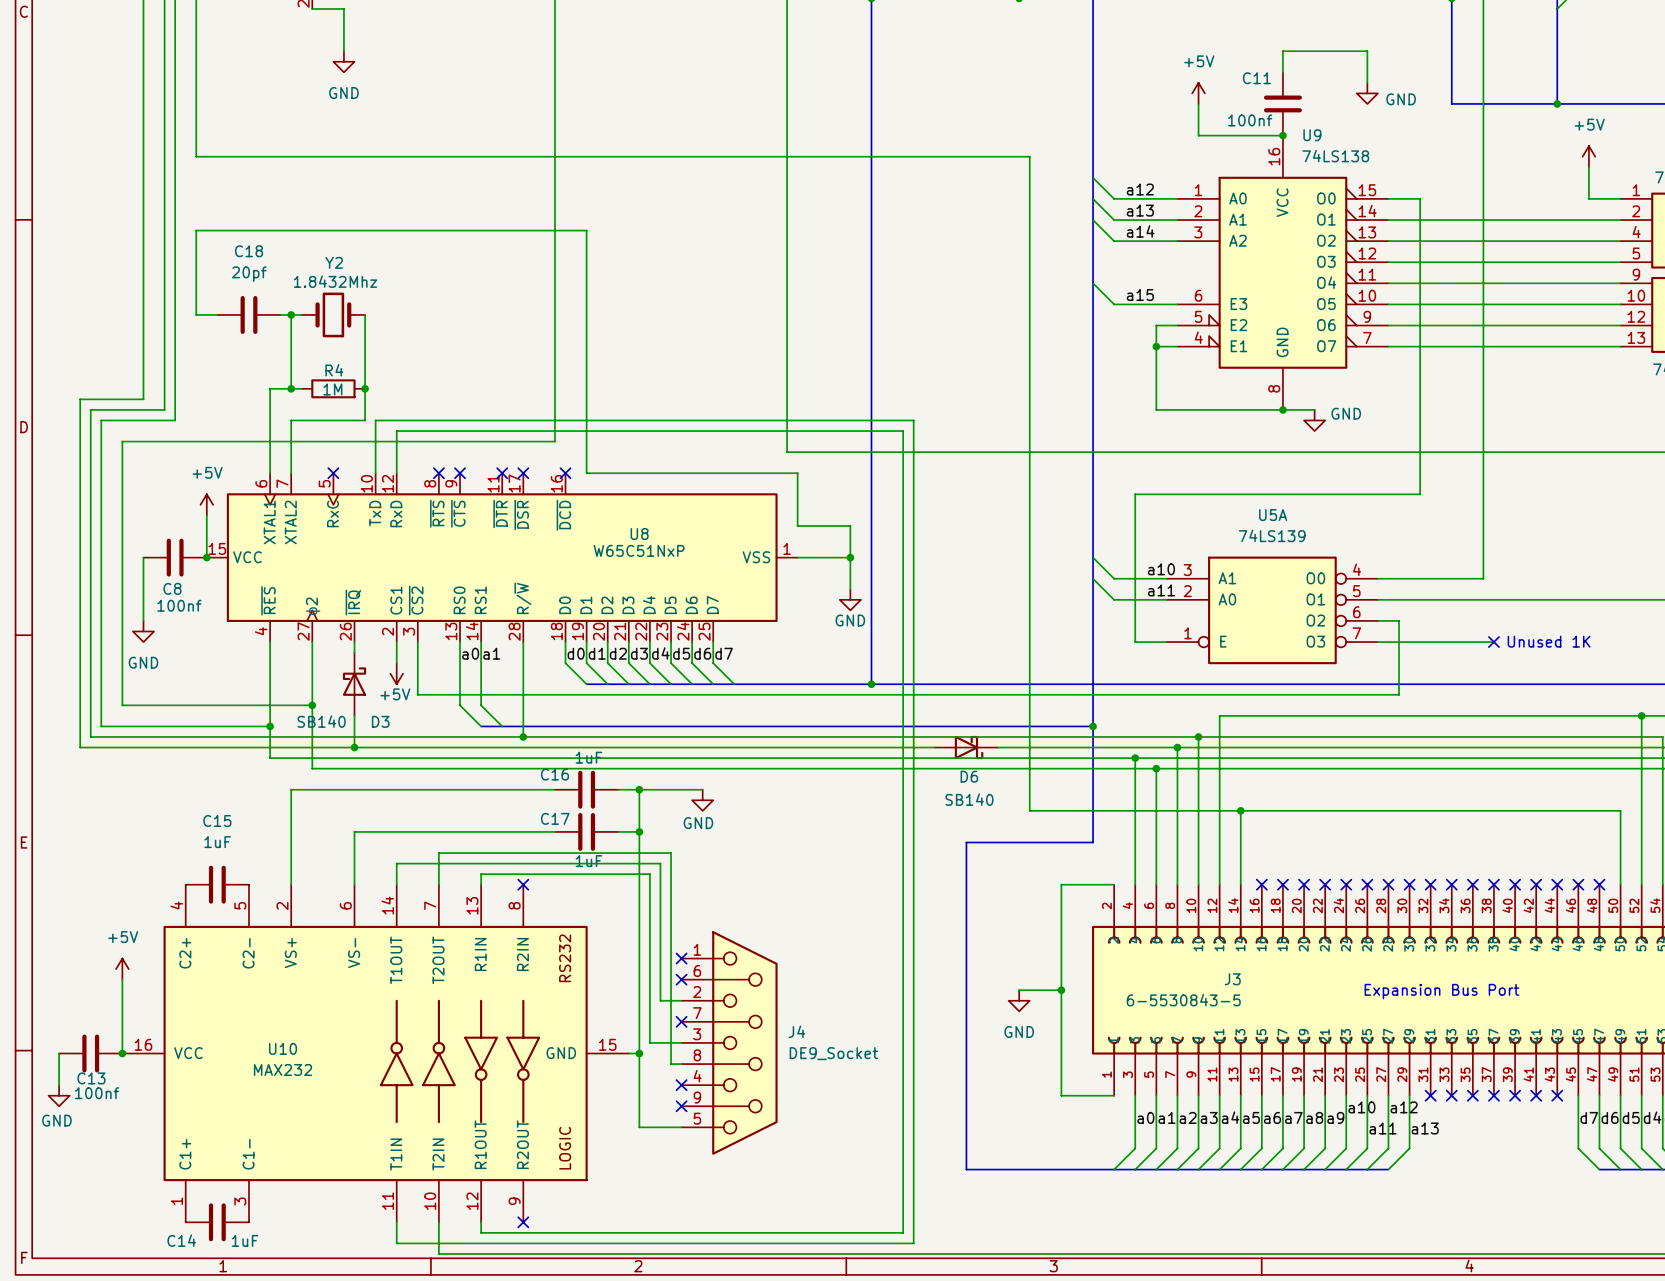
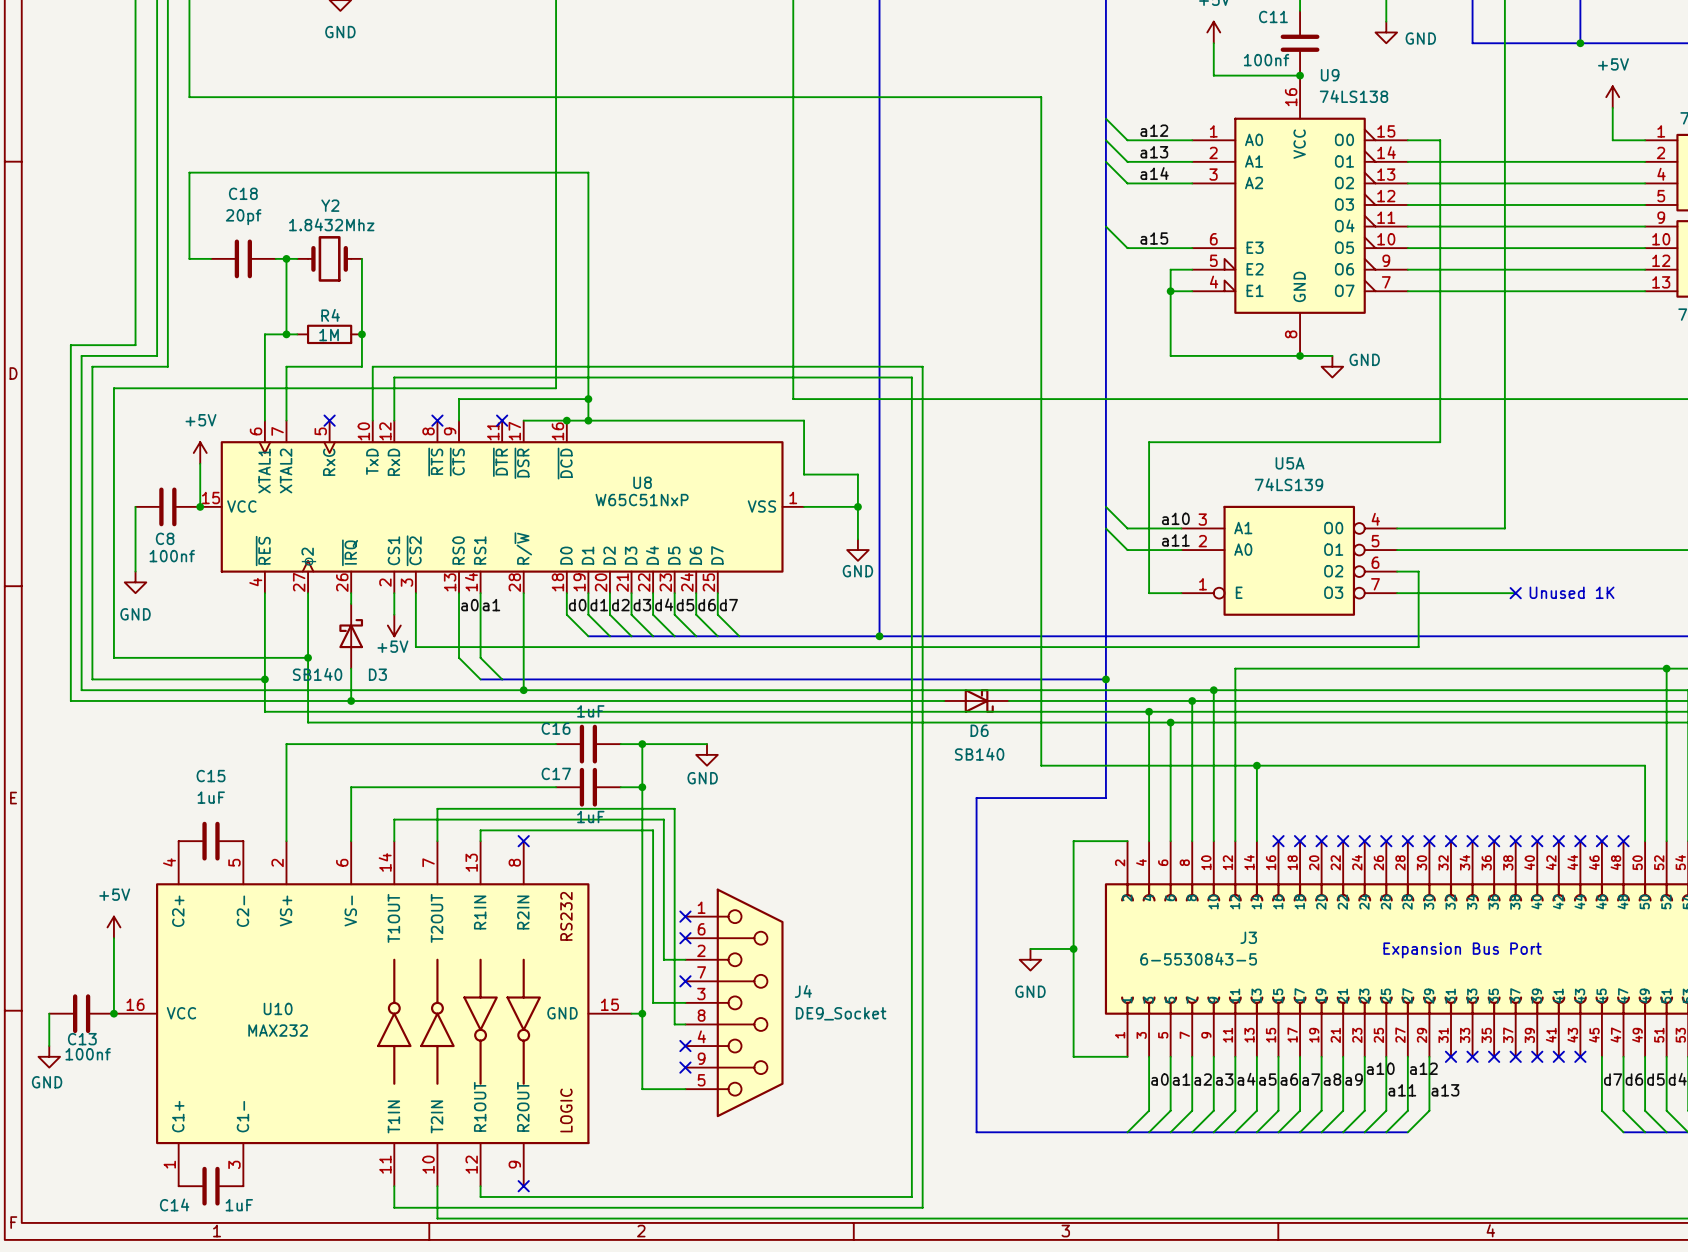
wire: none -> (588, 399) (459, 399) (459, 420)
junction: none -> (588, 399)
no-connect mark: (460, 473) -> none
wire: none -> (523, 420) (588, 420)
no-connect mark: (523, 473) -> none
no-connect mark: (565, 473) -> none
junction: none -> (566, 420)
junction: none -> (588, 420)

